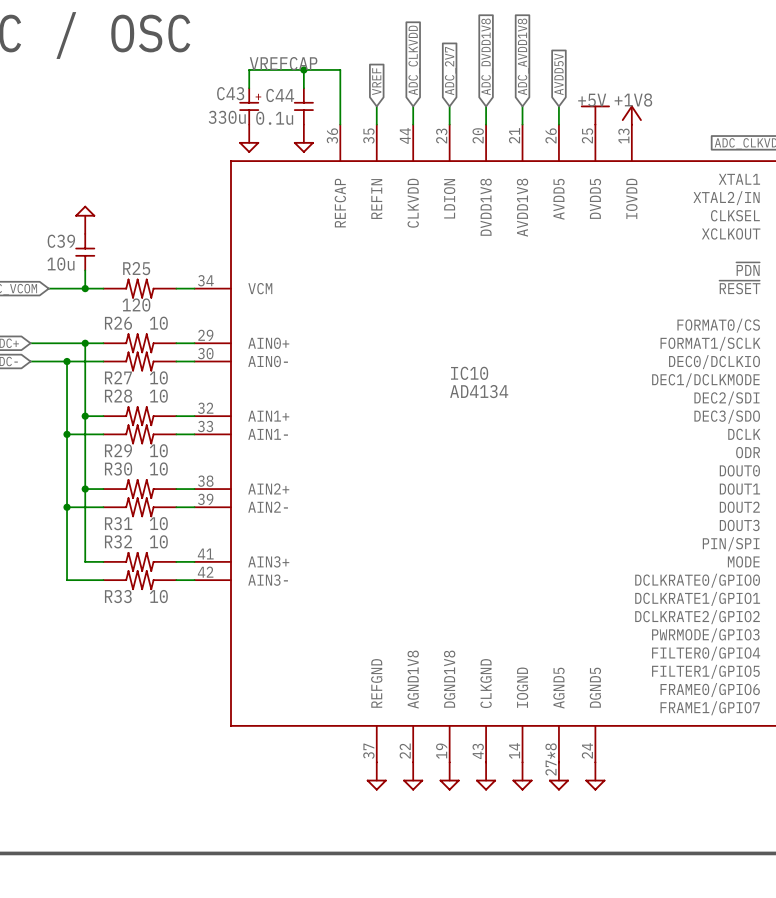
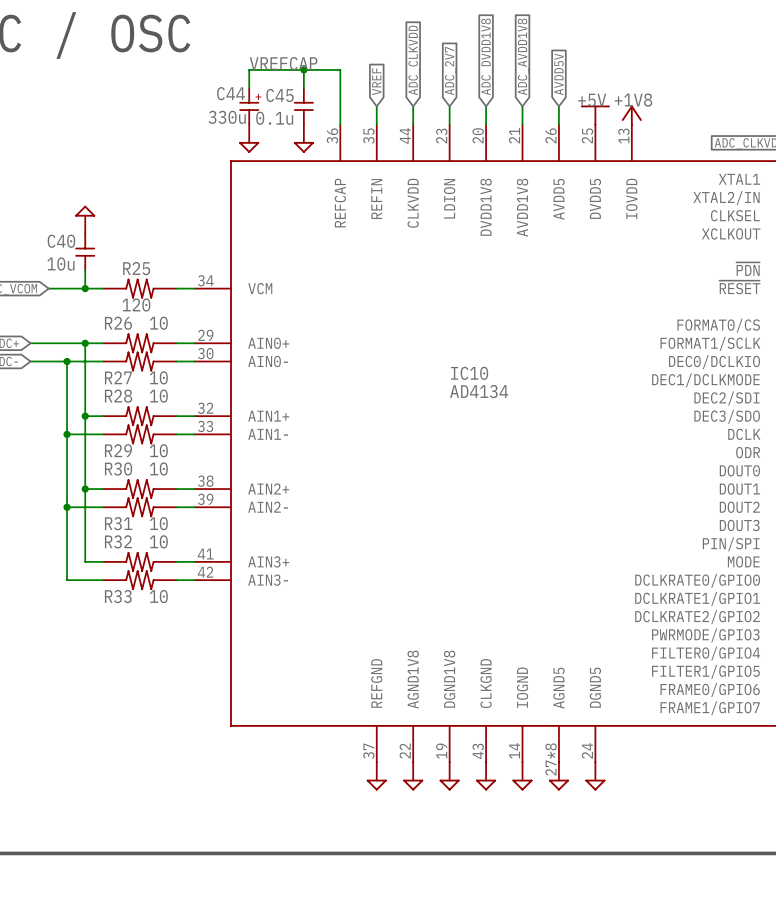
C43 name: C43 (230, 93) -> C44 (231, 93)
C44 name: C44 (280, 95) -> C45 (279, 95)
C39 name: C39 (61, 241) -> C40 (61, 241)

